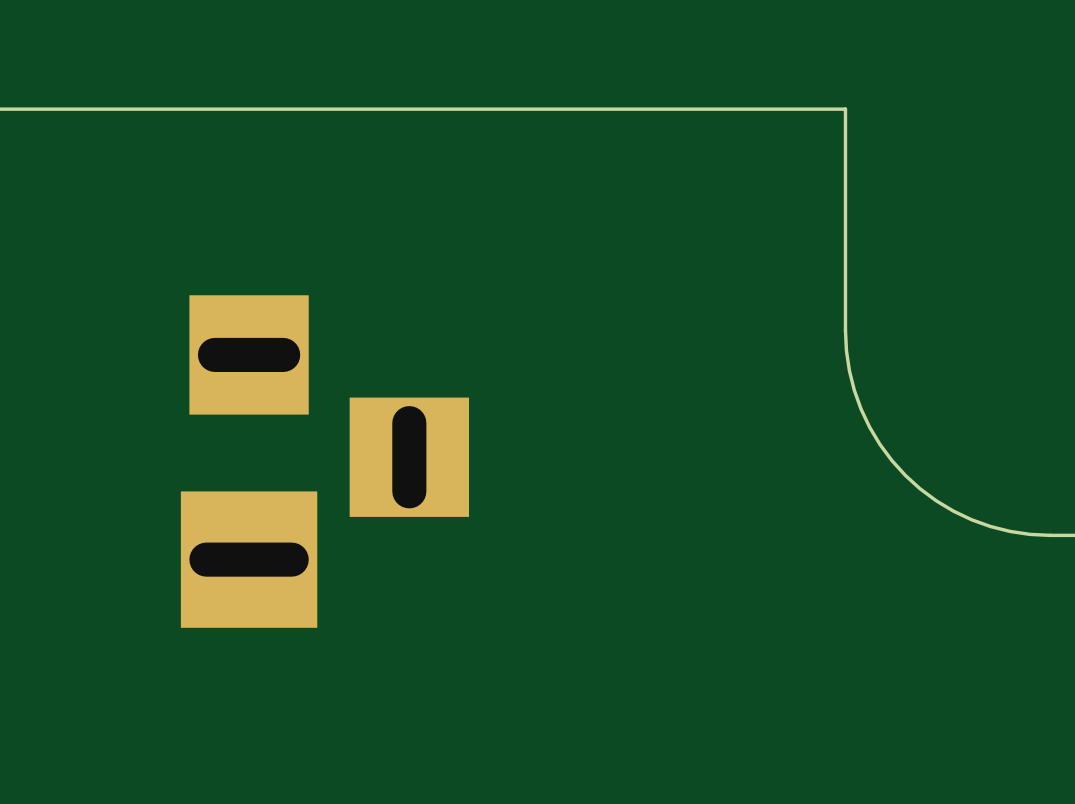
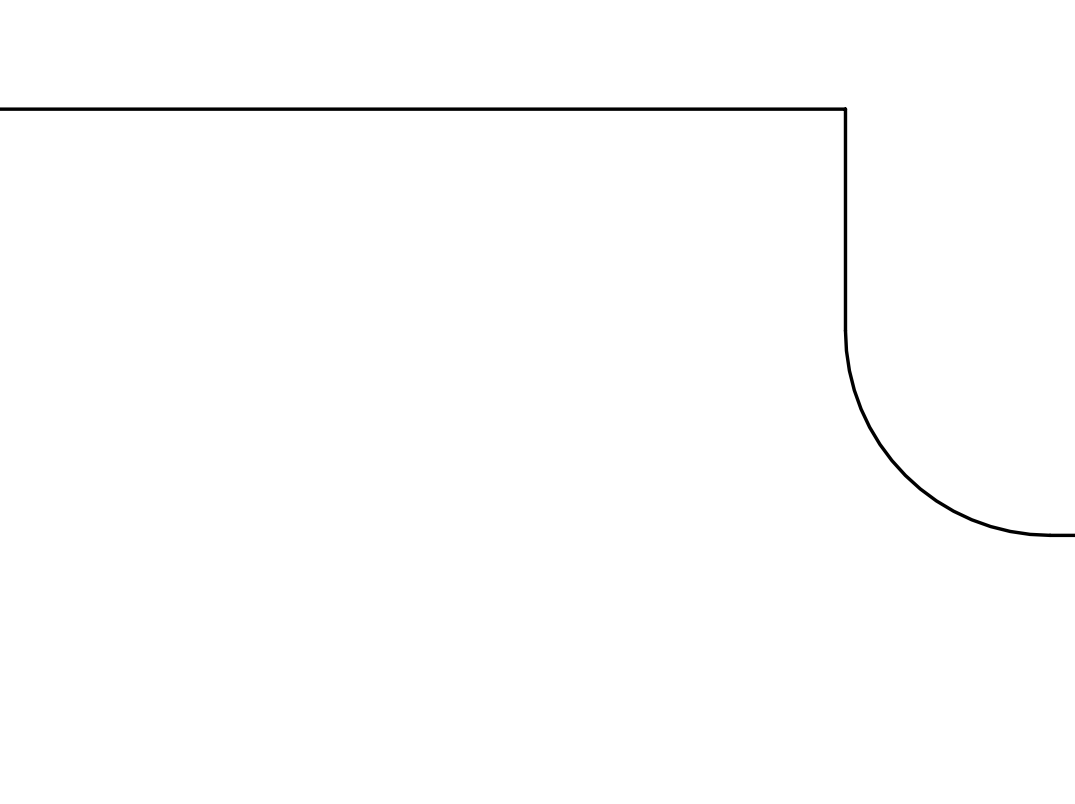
part: (324, 461) -> none

